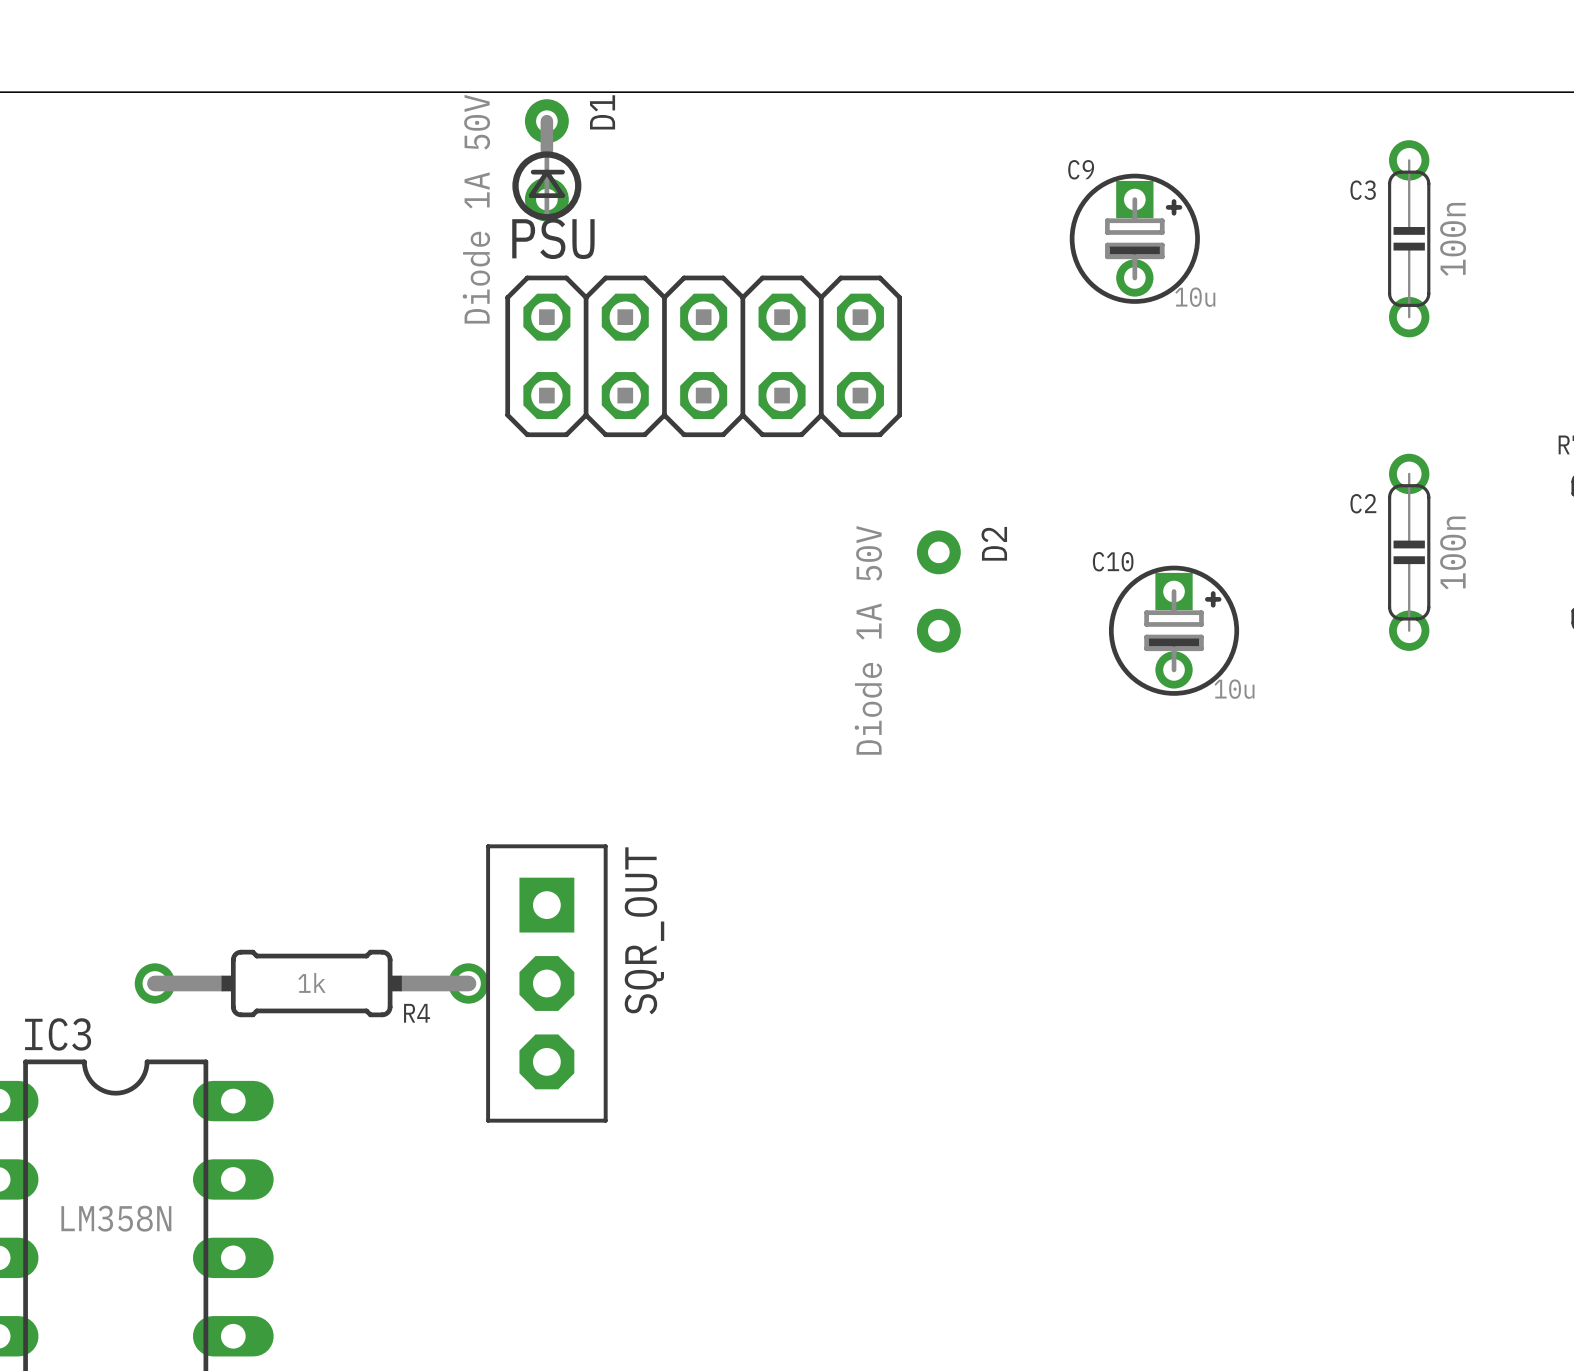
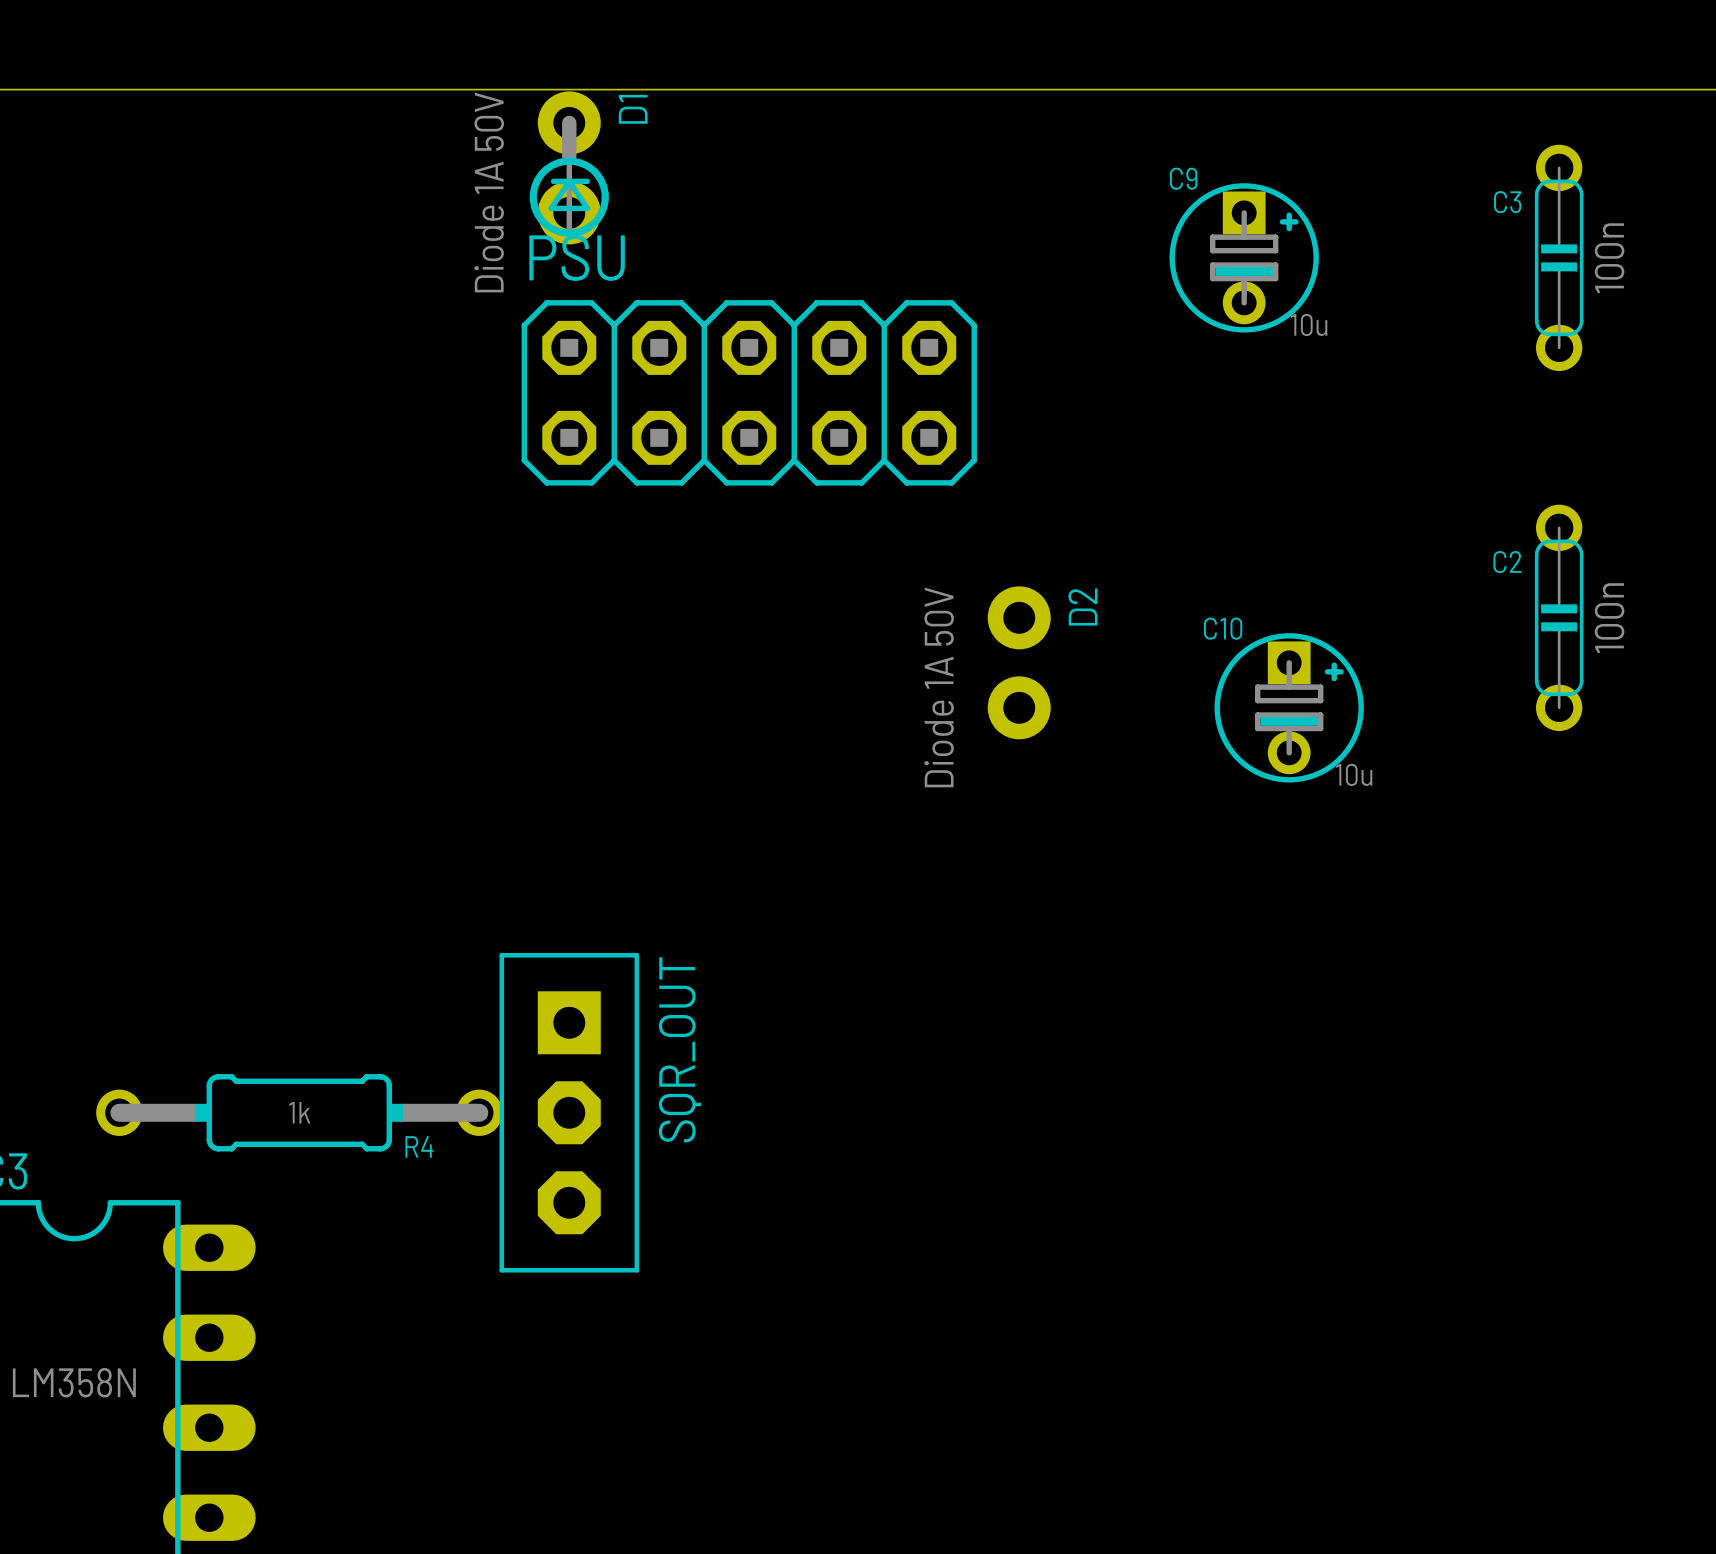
D1 footprint: [512, 99, 582, 222] -> [529, 91, 609, 245]
D2 footprint: [916, 530, 961, 653] -> [987, 586, 1051, 740]

